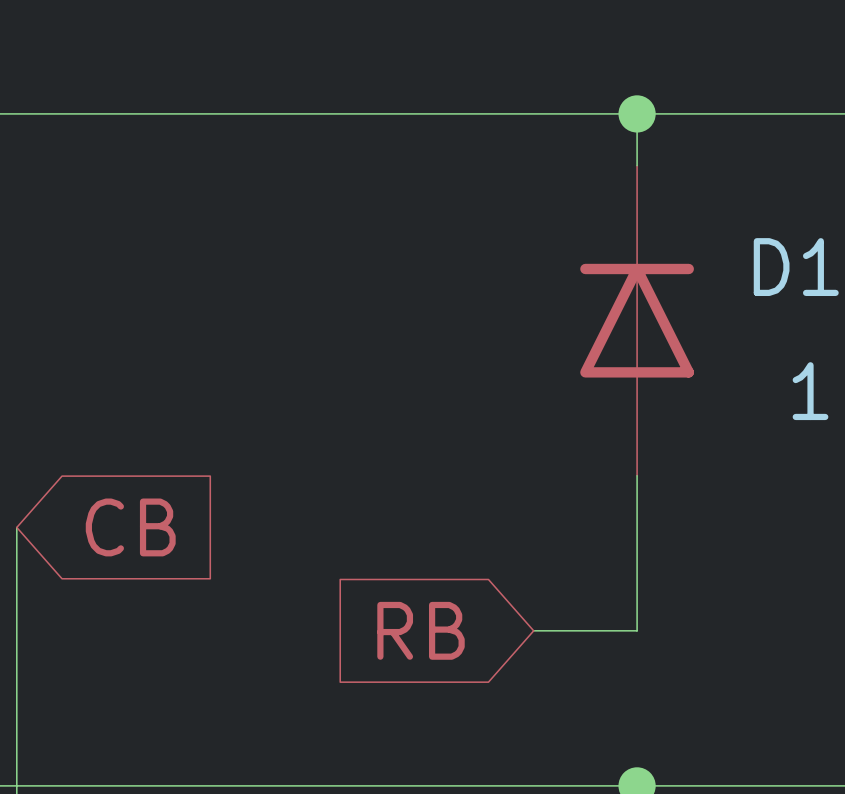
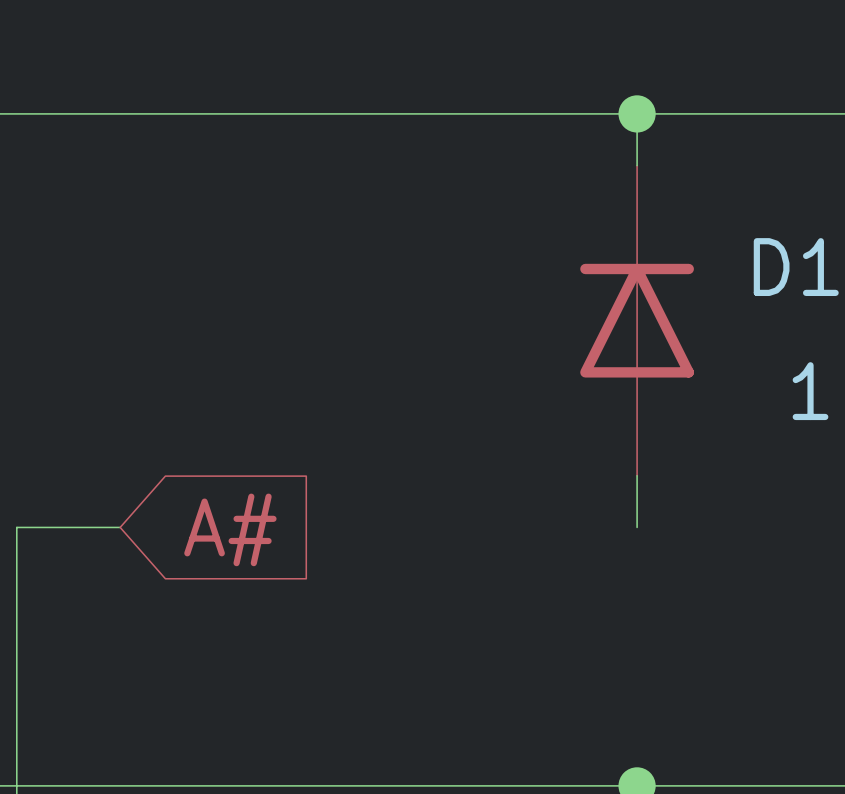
wire: none -> (16, 527) (120, 527)
global label: CB (130, 527) -> none
wire: (637, 527) (637, 630) (533, 630) -> none
global label: none -> A# (230, 529)
global label: RB (421, 630) -> none

